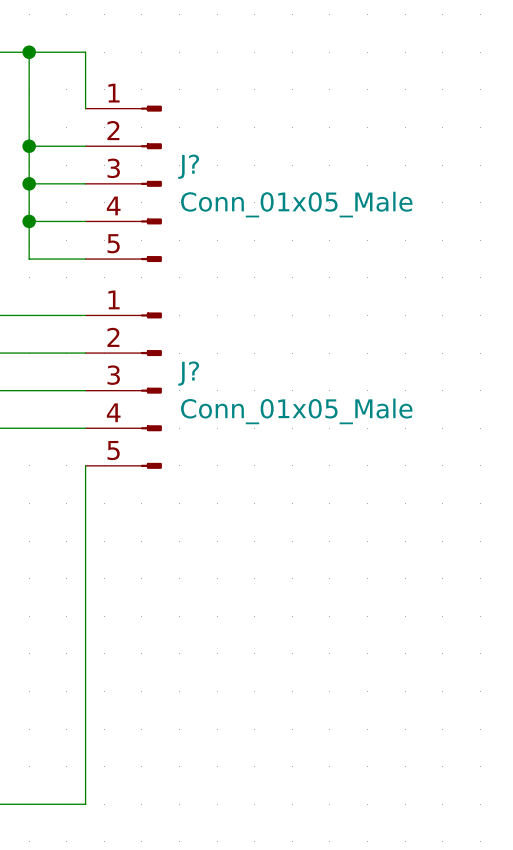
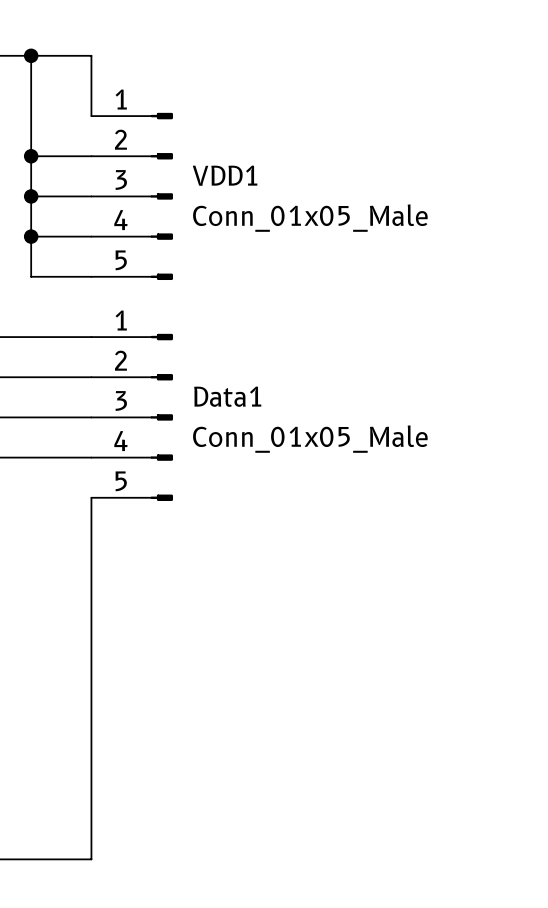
J? name: J? (188, 166) -> VDD1 (225, 175)
J? name: J? (188, 373) -> Data1 (227, 396)

